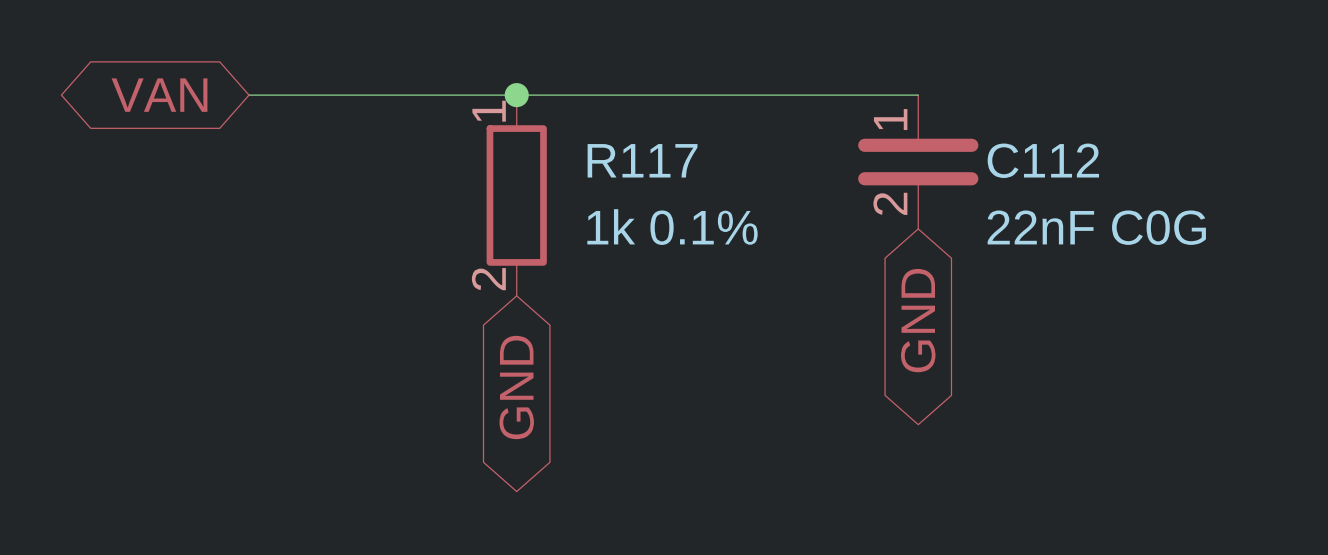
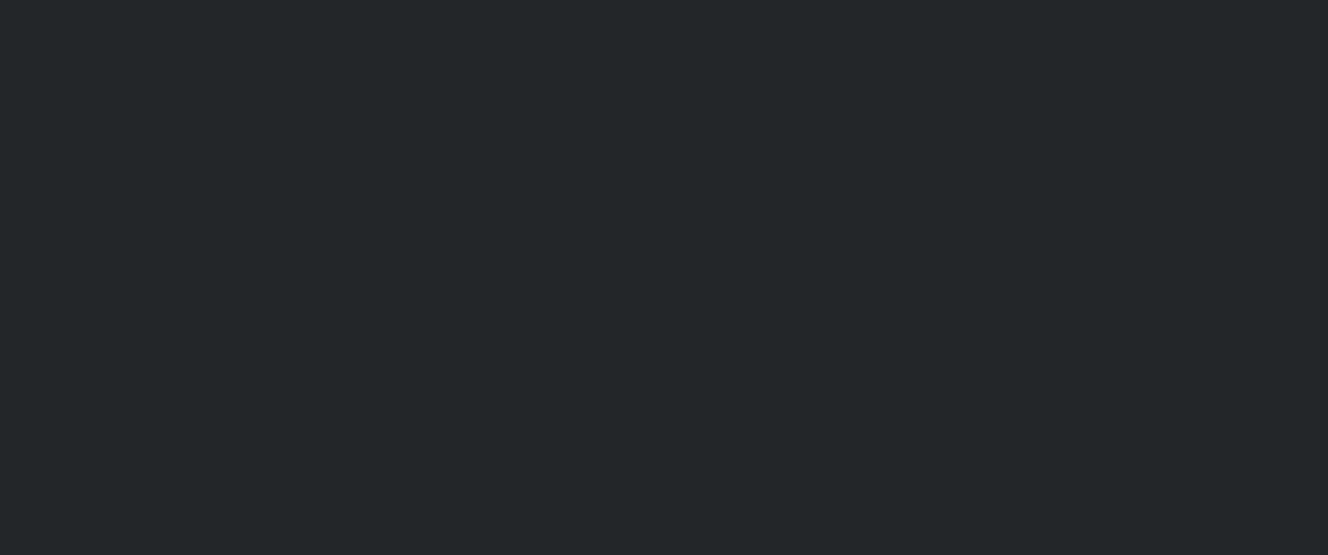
global label: VAN (159, 95) -> none
wire: (249, 95) (918, 95) -> none
junction: (516, 95) -> none
C112: 22nF C0G (918, 162) -> none
R117: 1k 0.1% (516, 195) -> none
global label: GND (918, 320) -> none
global label: GND (516, 387) -> none

